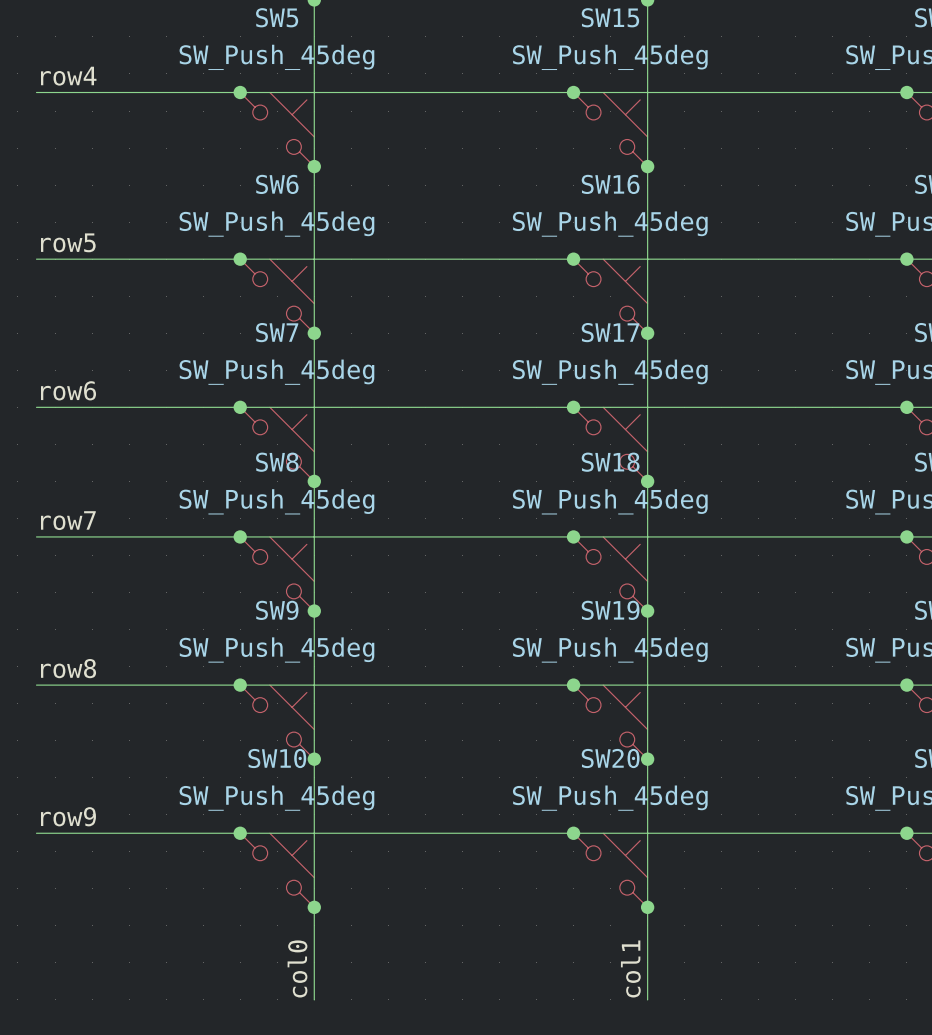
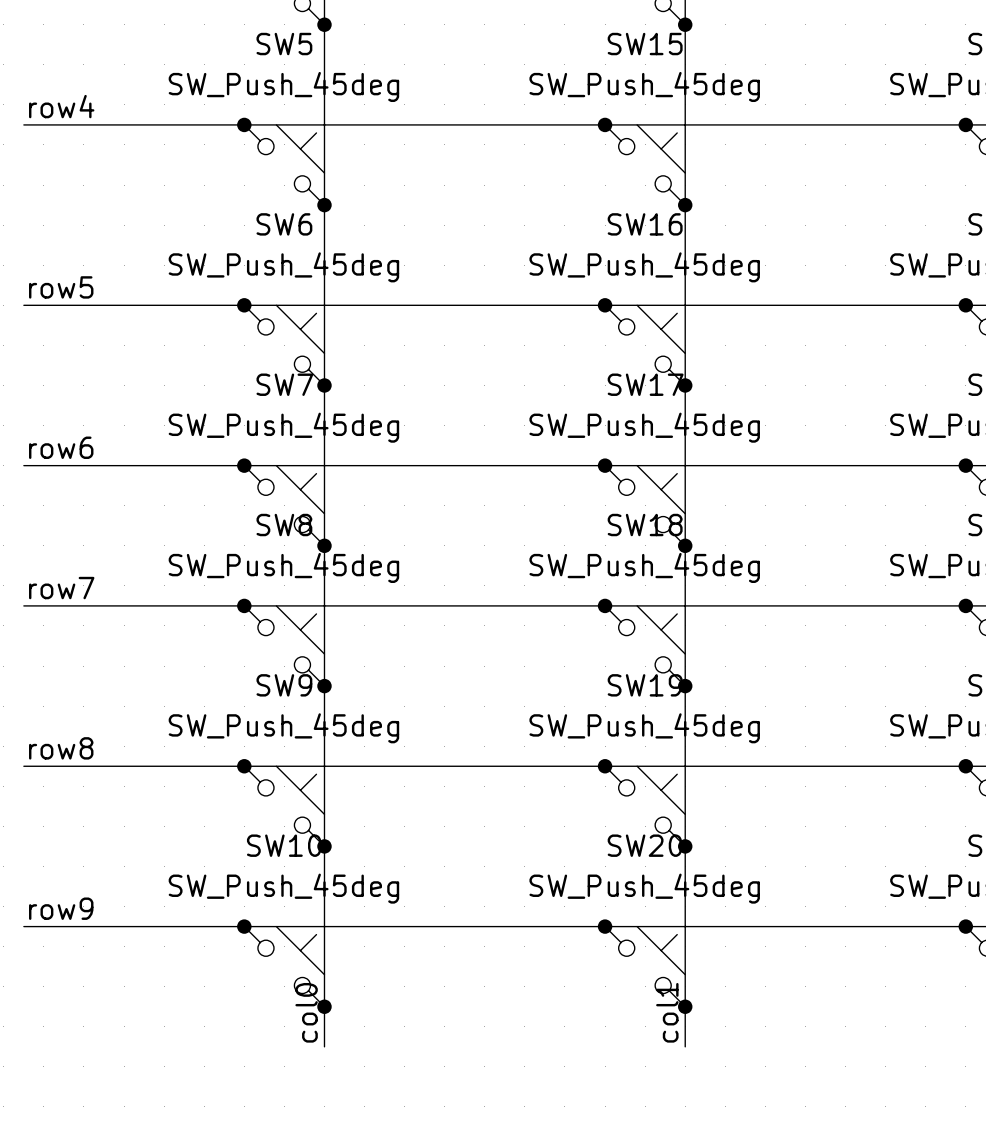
wire: (314, 944) (314, 999) -> none
wire: (647, 944) (647, 999) -> none
label position: col0 (297, 968) -> col0 (306, 1012)
label position: col1 (630, 968) -> col1 (667, 1012)

